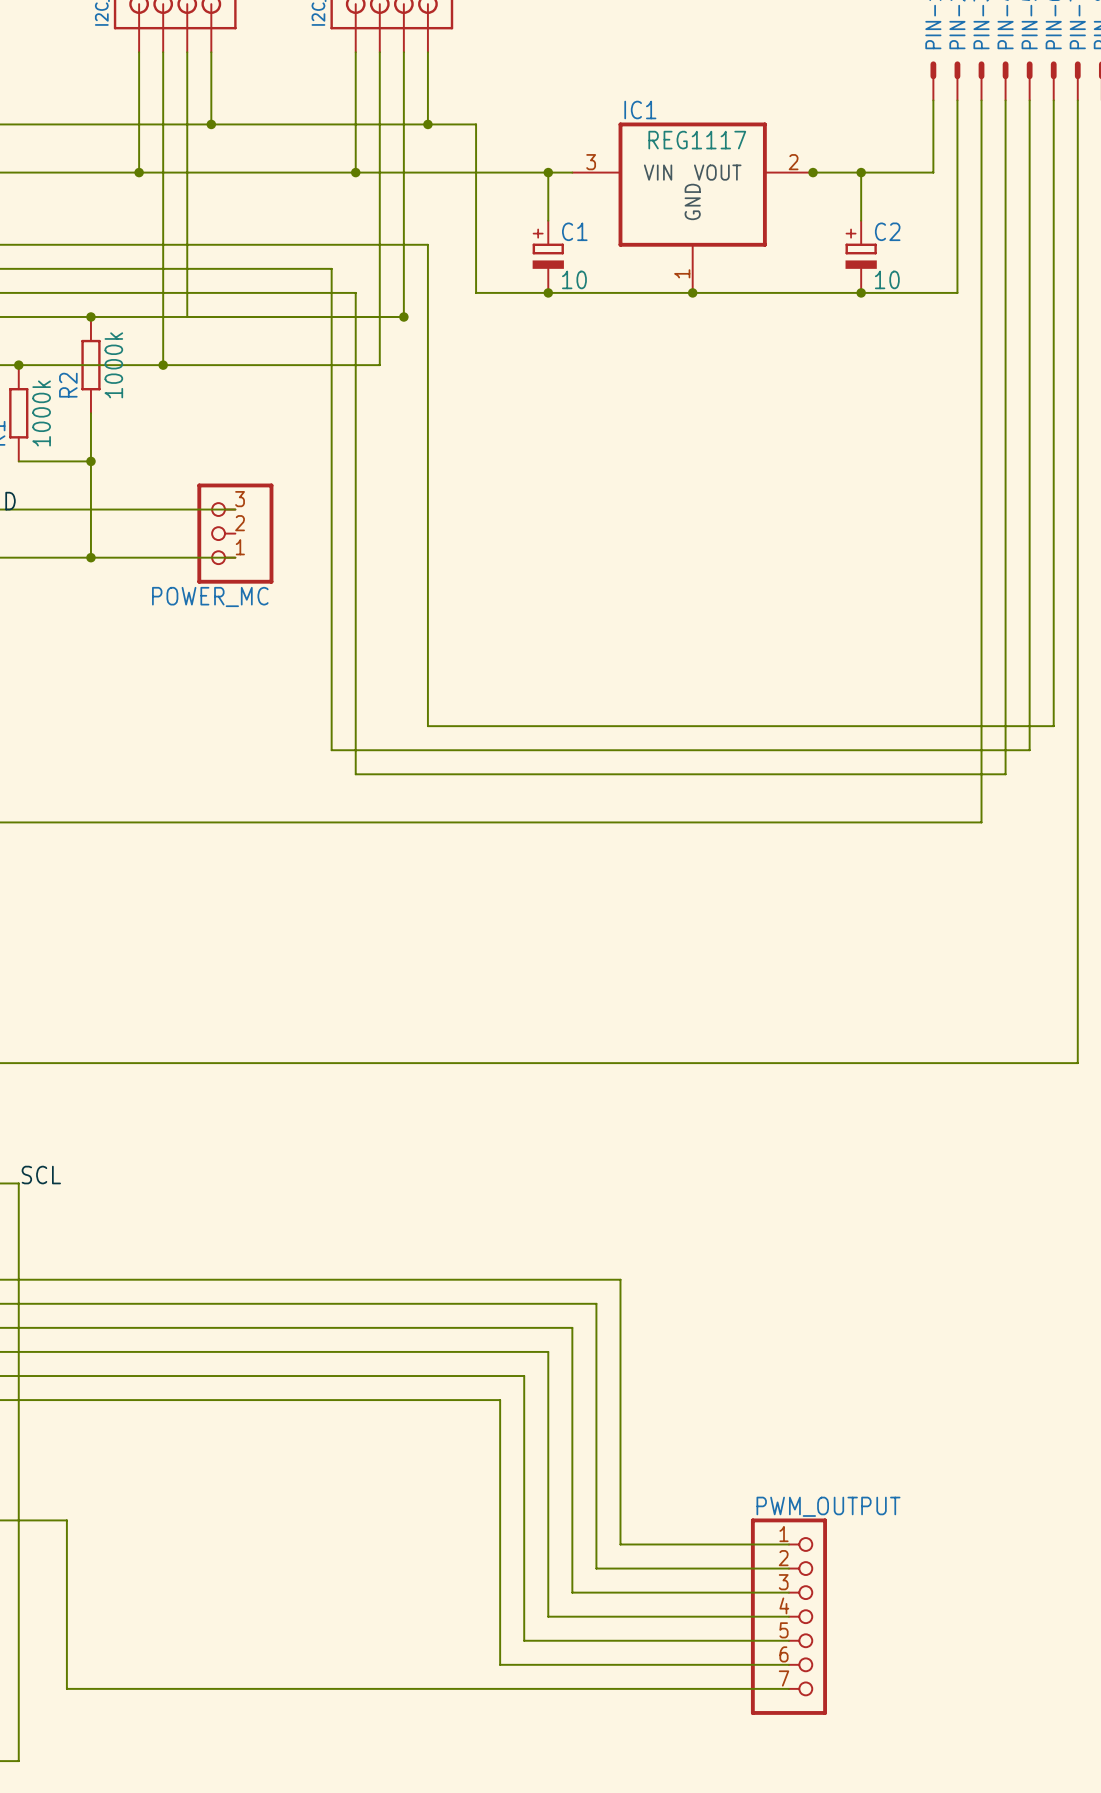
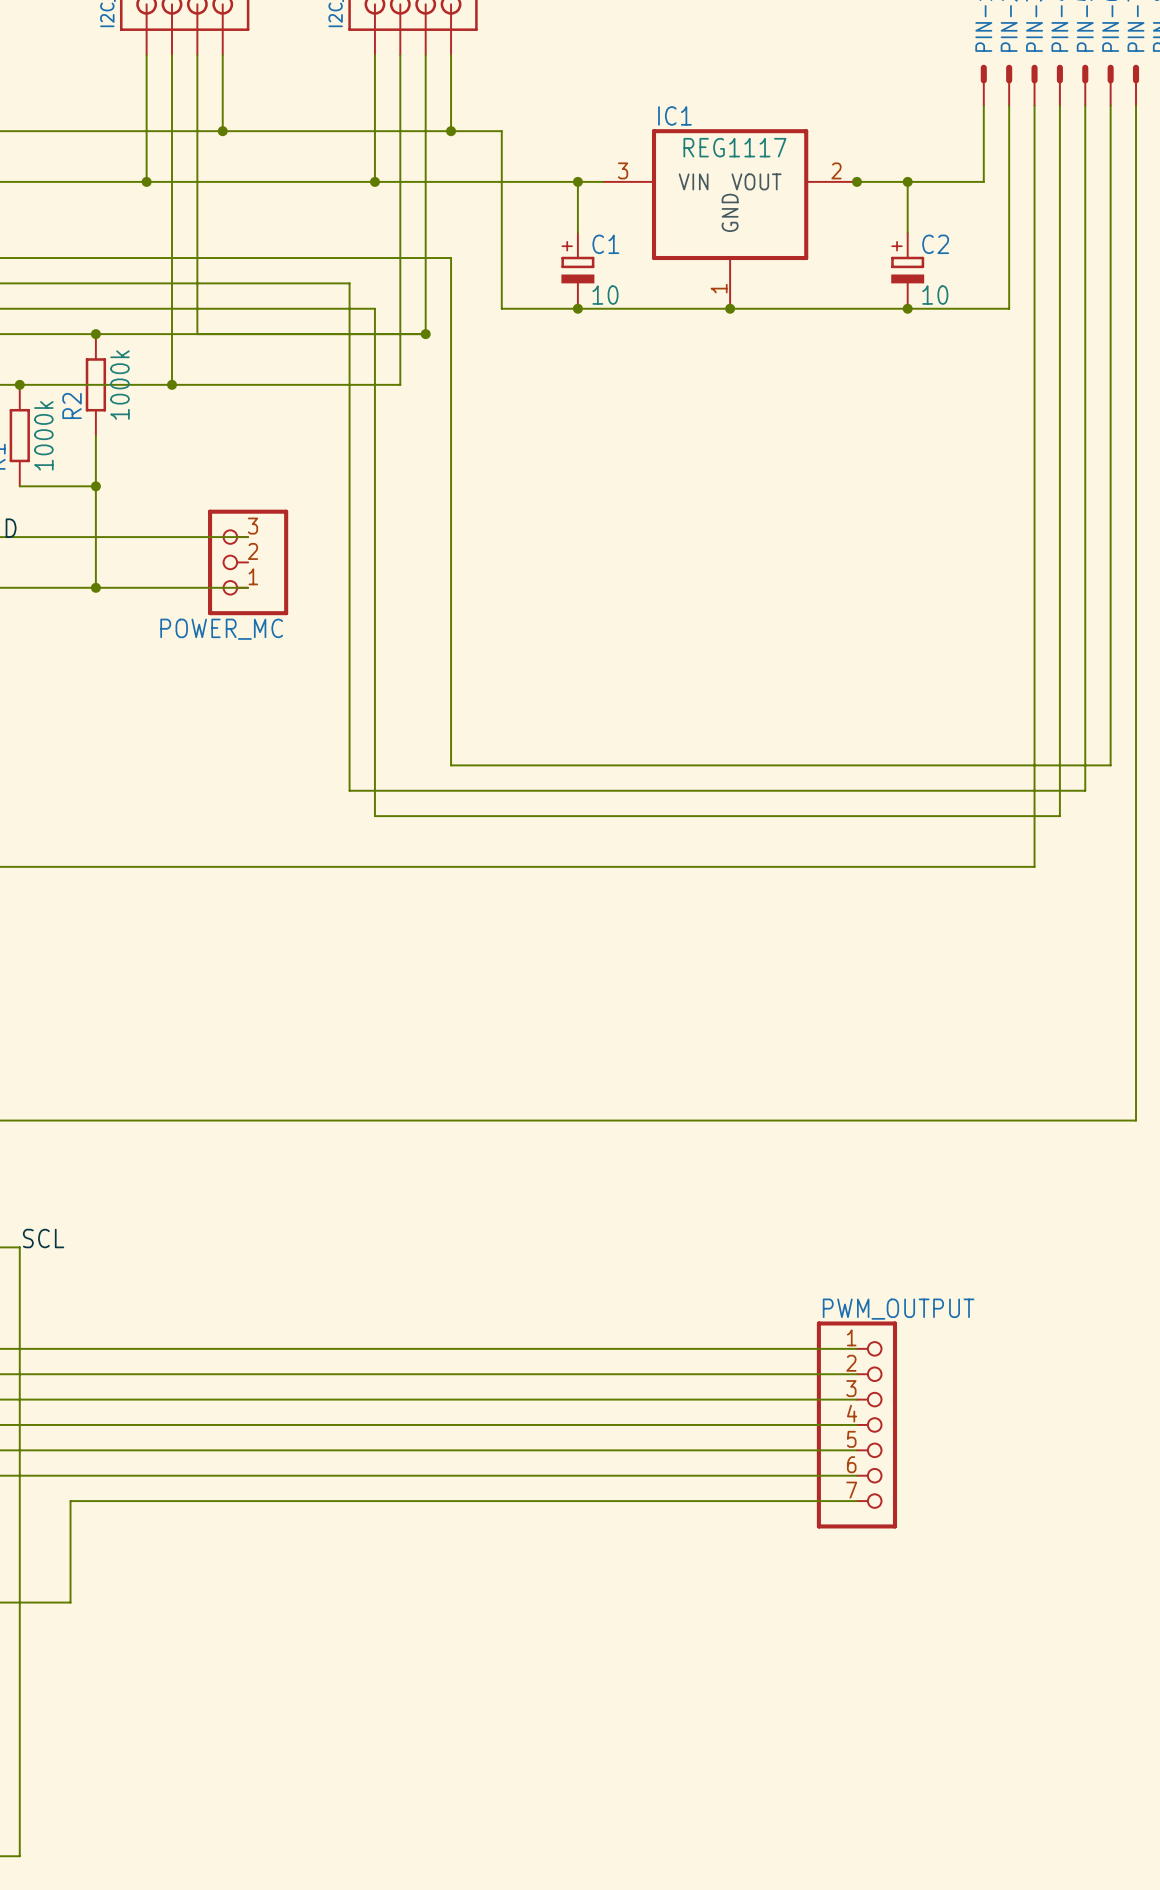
wire: (620, 1279) (620, 1544) (788, 1544) -> (654, 1348) (856, 1348)
wire: (596, 1303) (596, 1568) (788, 1568) -> (628, 1374) (856, 1374)
wire: (572, 1327) (572, 1592) (788, 1592) -> (603, 1399) (856, 1399)
wire: (548, 1351) (548, 1616) (788, 1616) -> (577, 1424) (856, 1424)
PWM_OUTPUT: none -> (856, 1424)
wire: (524, 1376) (524, 1640) (788, 1640) -> (552, 1450) (856, 1450)
wire: (500, 1400) (500, 1664) (788, 1664) -> (527, 1475) (856, 1475)
wire: (66, 1520) (66, 1688) (788, 1688) -> (70, 1602) (70, 1501) (856, 1501)
PWM_OUTPUT: (788, 1616) -> none

